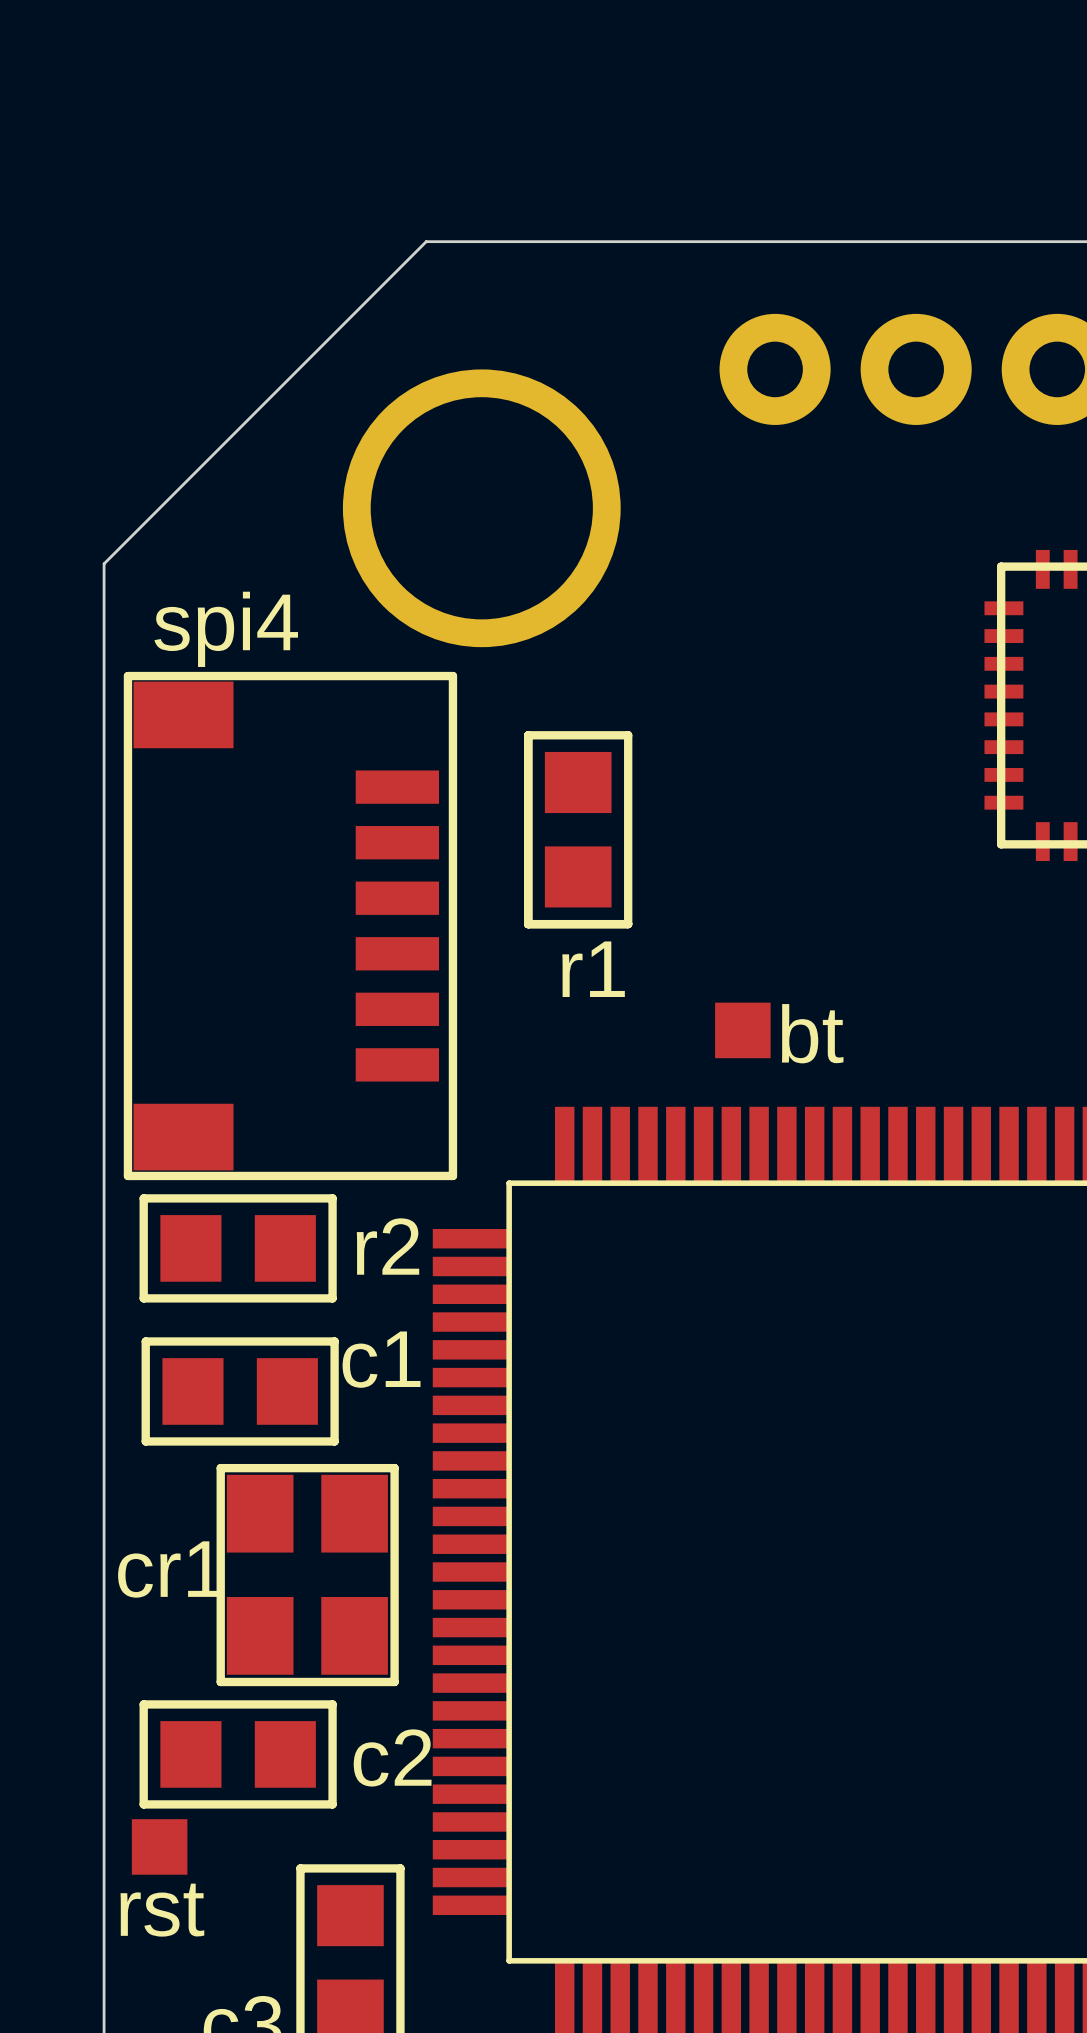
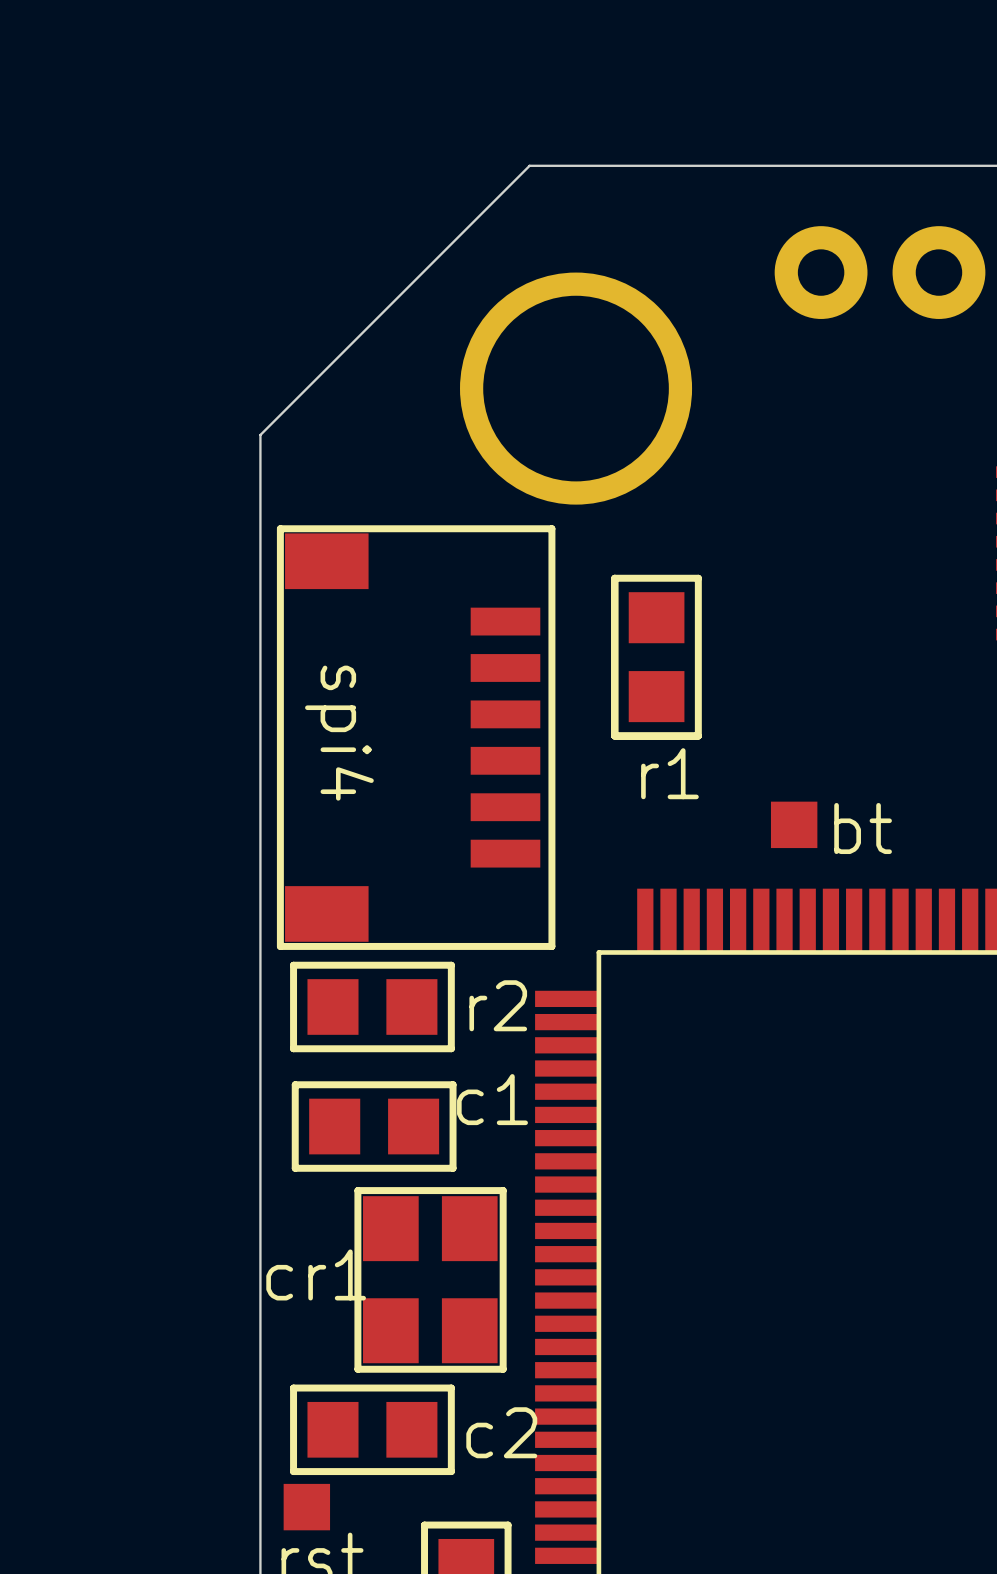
spi4 name rotation: 0° (226, 629) -> 90° clockwise (339, 733)
spi4 name position: spi4 (226, 629) -> spi4 (339, 733)

